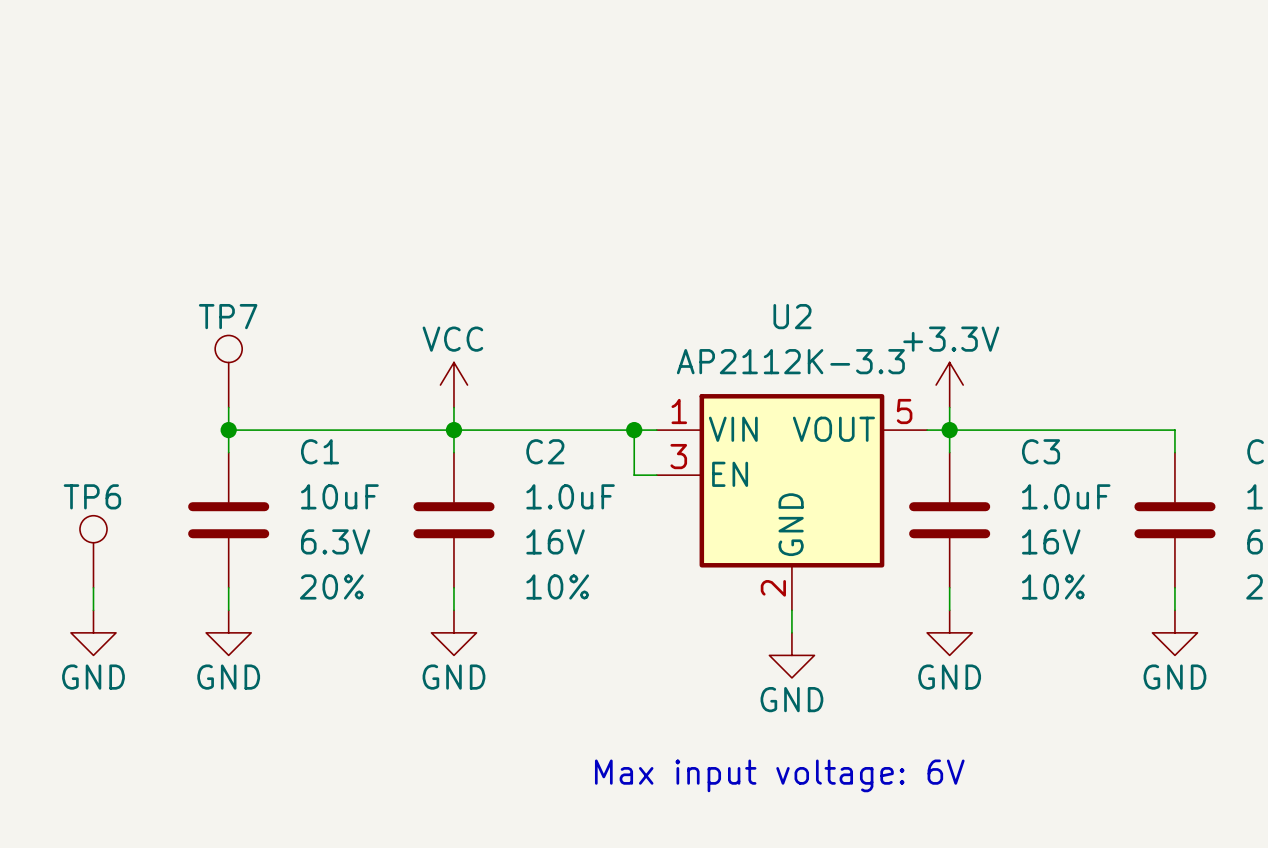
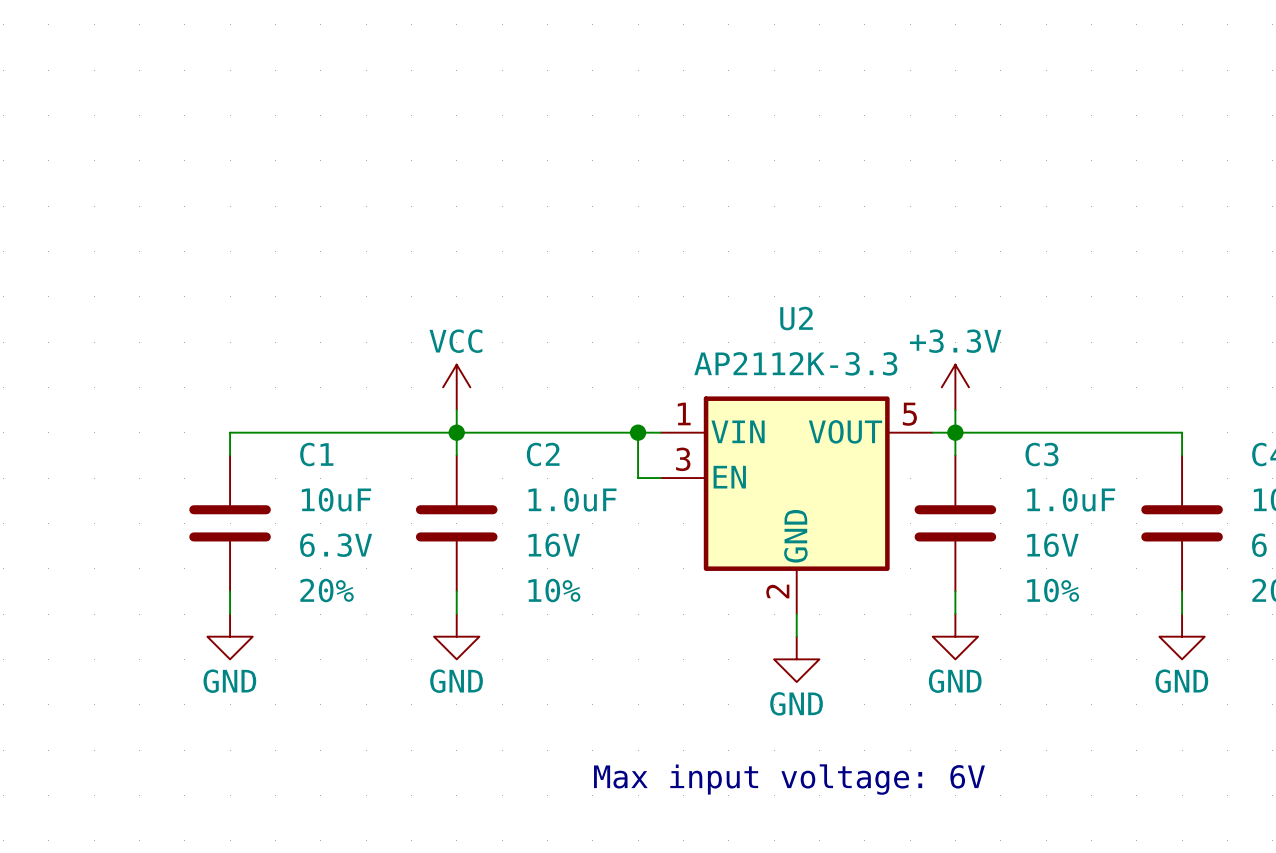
TP7: (228, 371) -> none
wire: (228, 407) (228, 430) -> none
junction: (228, 430) -> none
TP6: (93, 551) -> none
wire: (93, 587) (93, 610) -> none
power symbol: GND (93, 632) -> none

